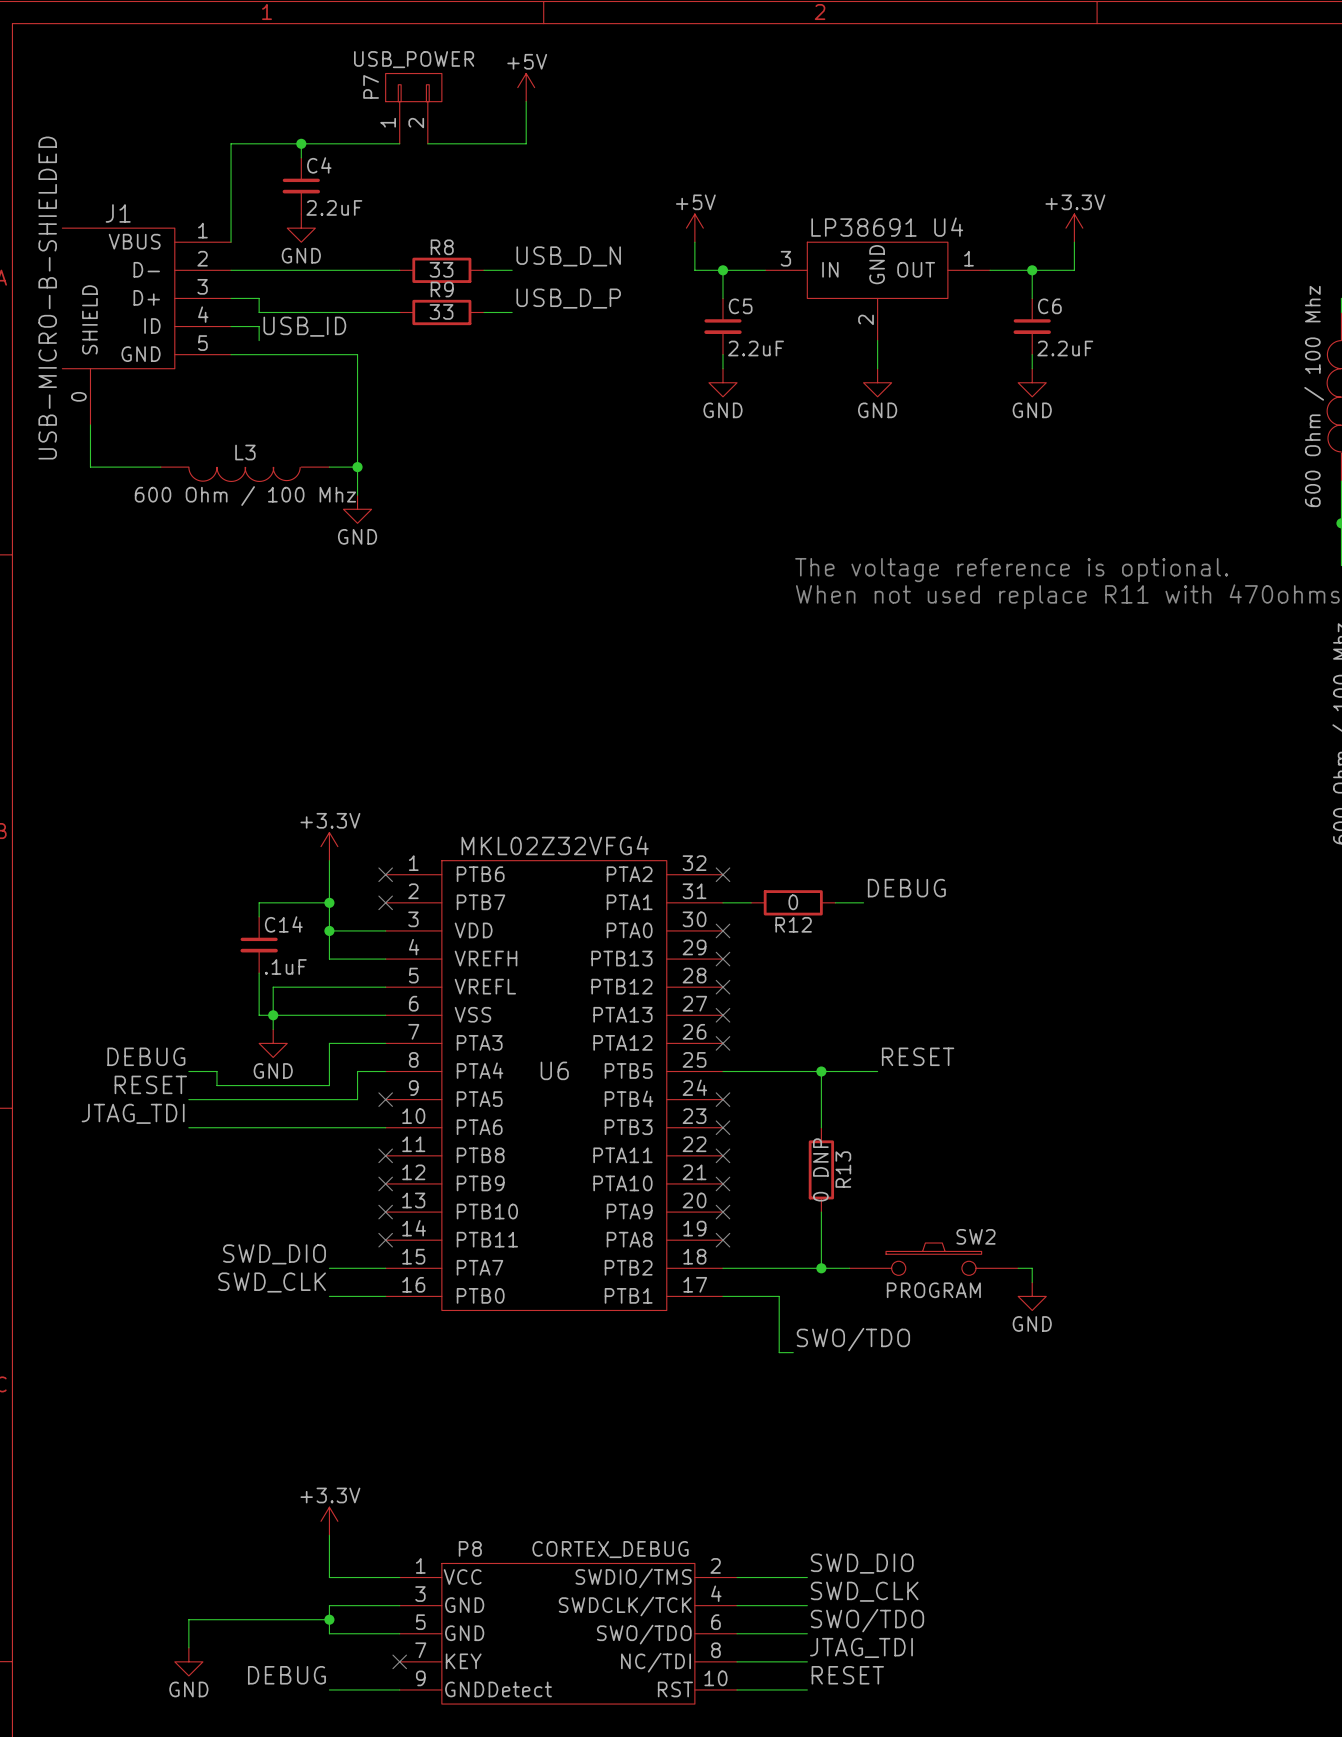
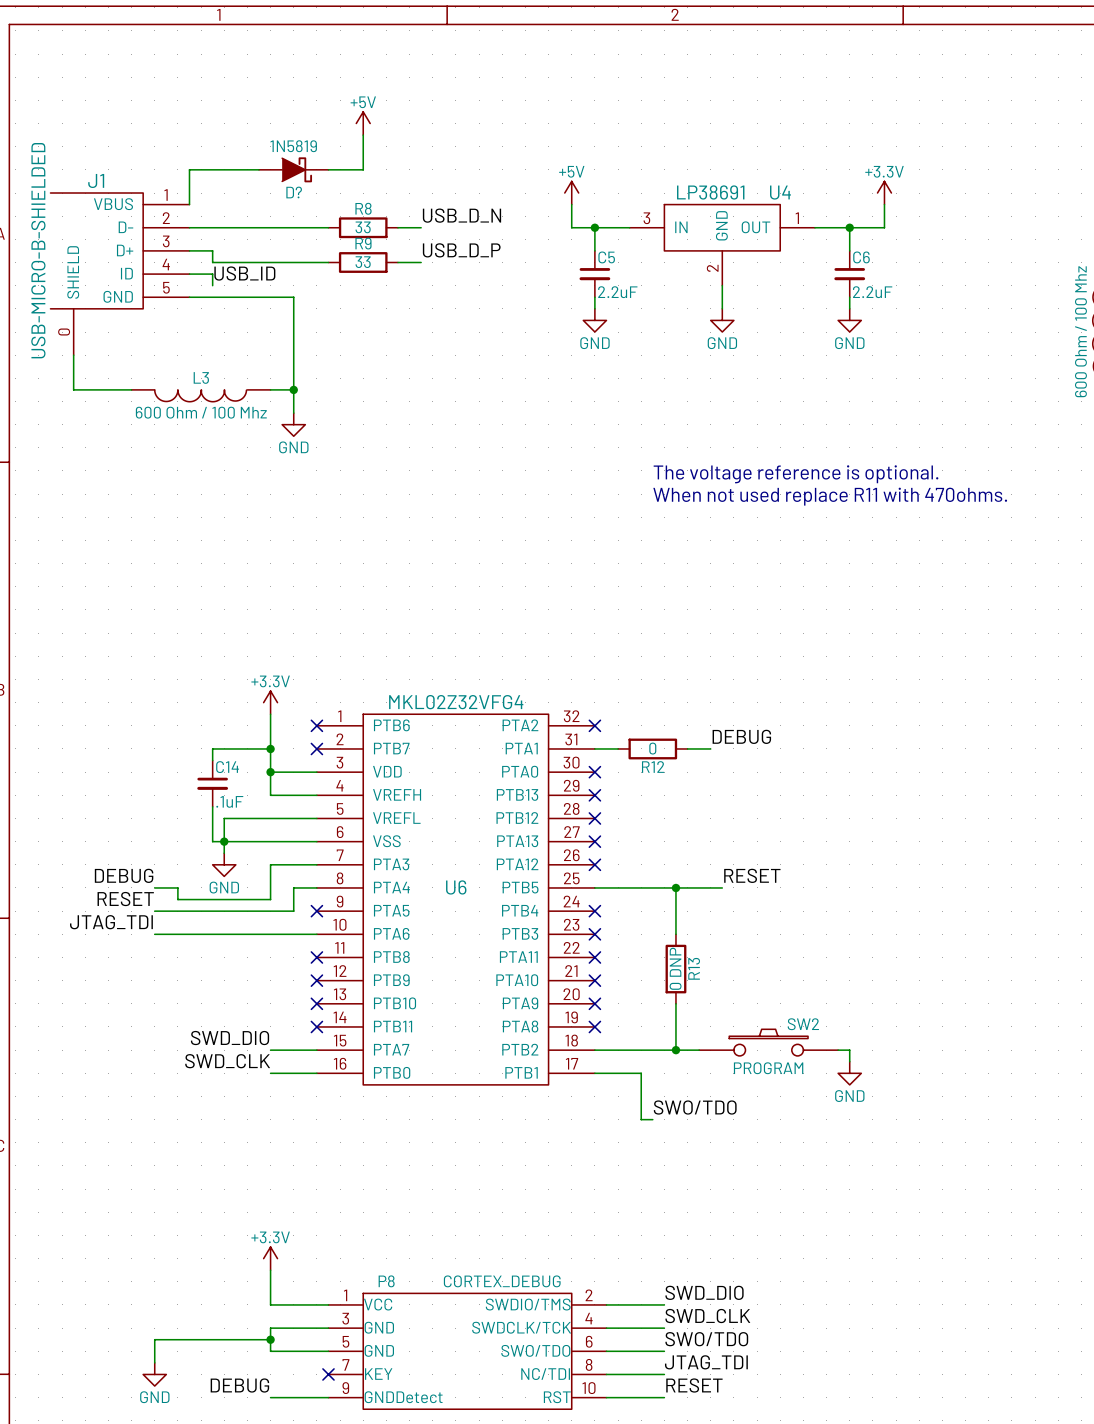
power symbol position: +5V (526, 87) -> +5V (363, 123)
wire: (526, 101) (526, 143) (427, 143) -> none
P7: USB_POWER (413, 108) -> none
wire: (301, 143) (301, 157) -> none
junction: (301, 143) -> none
wire: (399, 143) (231, 143) (231, 200) -> (258, 169) (189, 169)
wire: none -> (363, 135) (363, 169) (328, 169)
C4: 2.2uF (301, 185) -> none
D?: none -> 1N5819 (293, 169)
power symbol: GND (301, 228) -> none

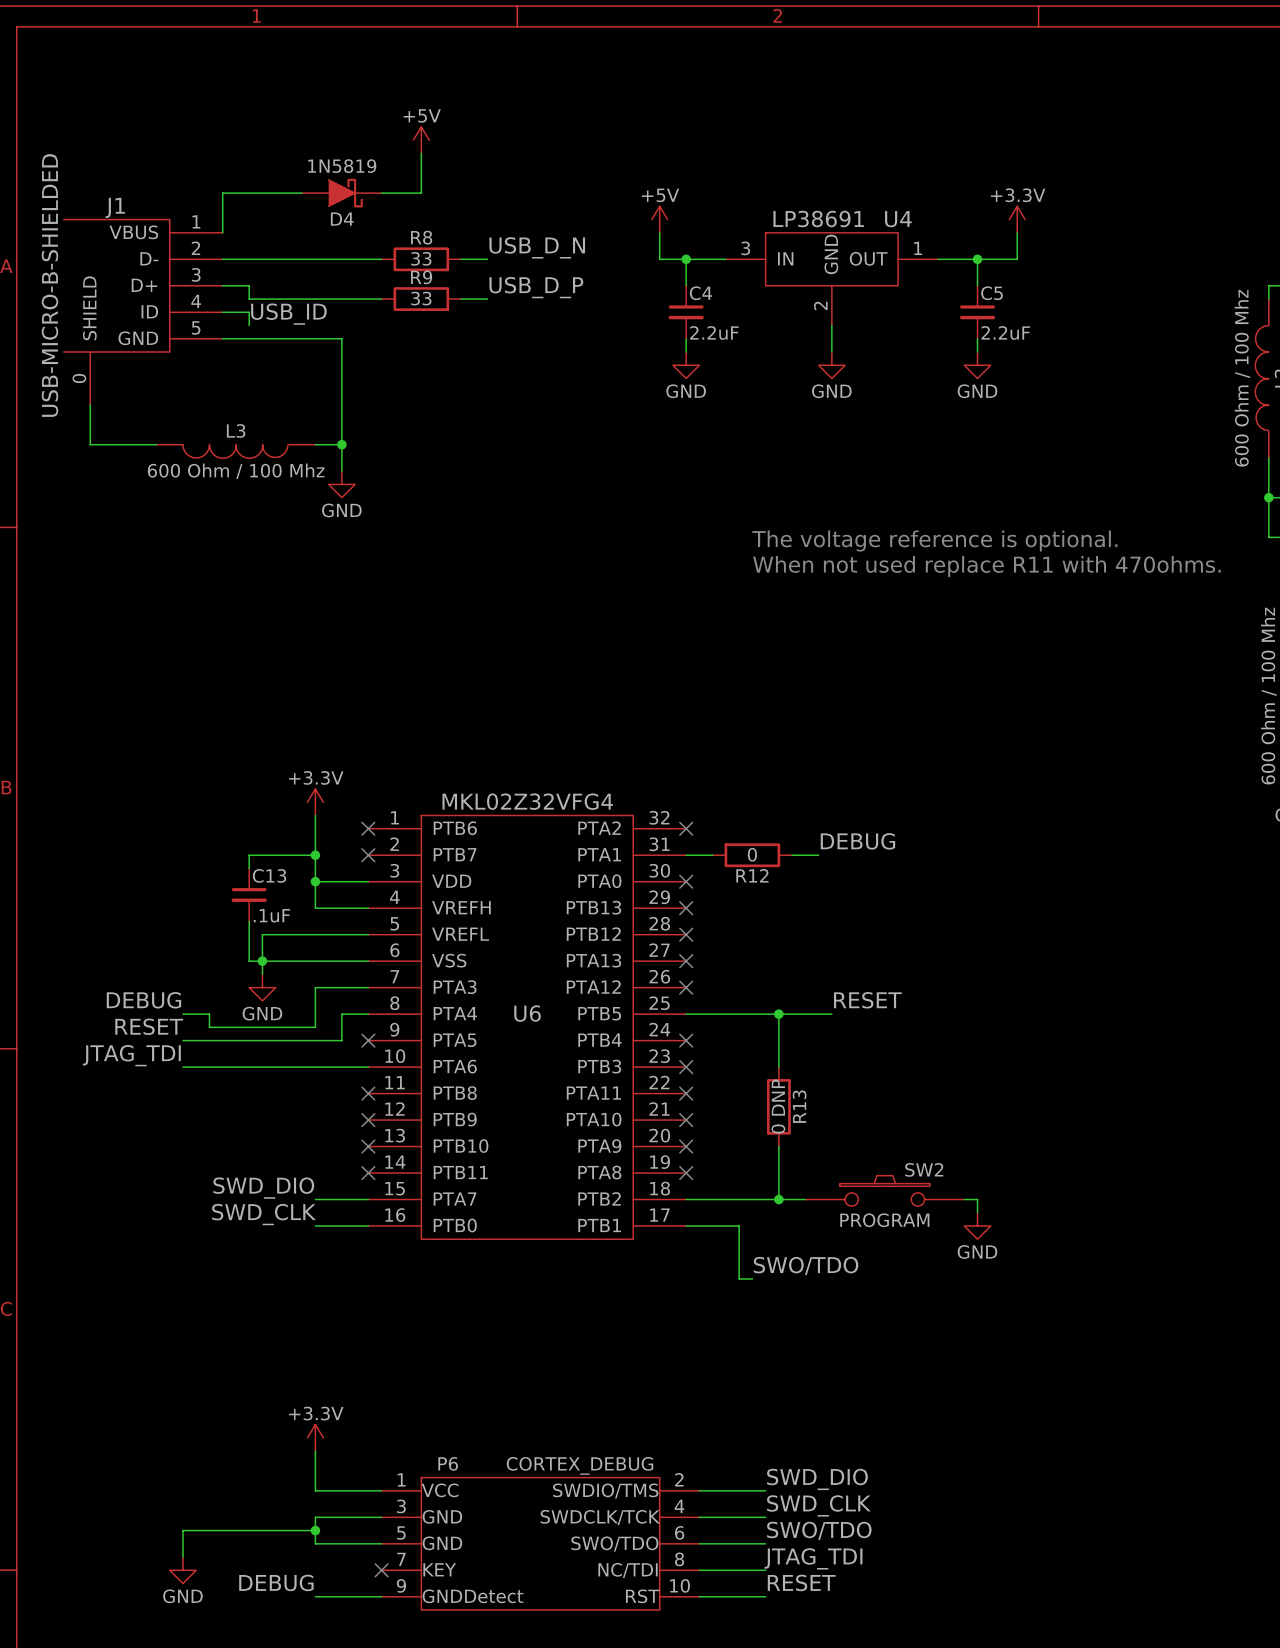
D? name: D? (294, 192) -> D4 (342, 219)
C5 name: C5 (606, 257) -> C4 (700, 293)
C6 name: C6 (861, 257) -> C5 (992, 293)
C14 name: C14 (227, 767) -> C13 (269, 875)
P8 name: P8 (386, 1281) -> P6 (448, 1463)

